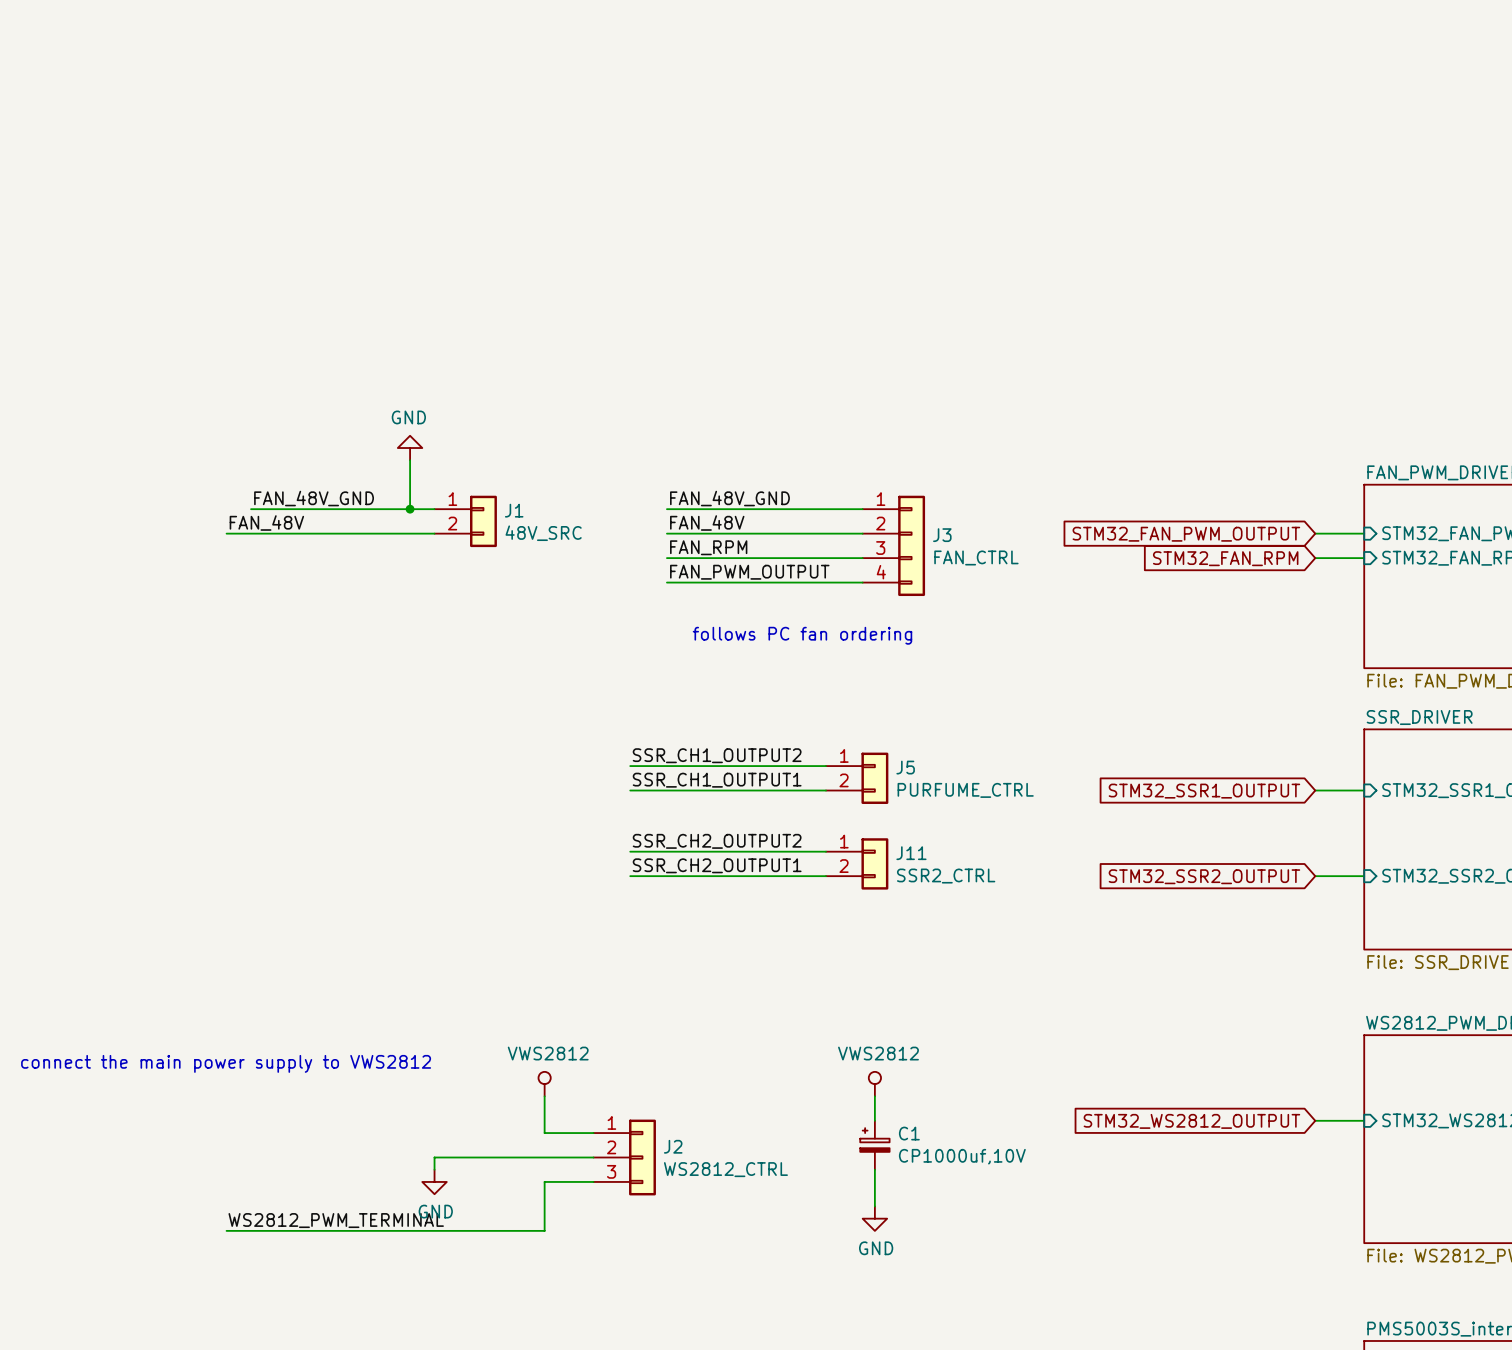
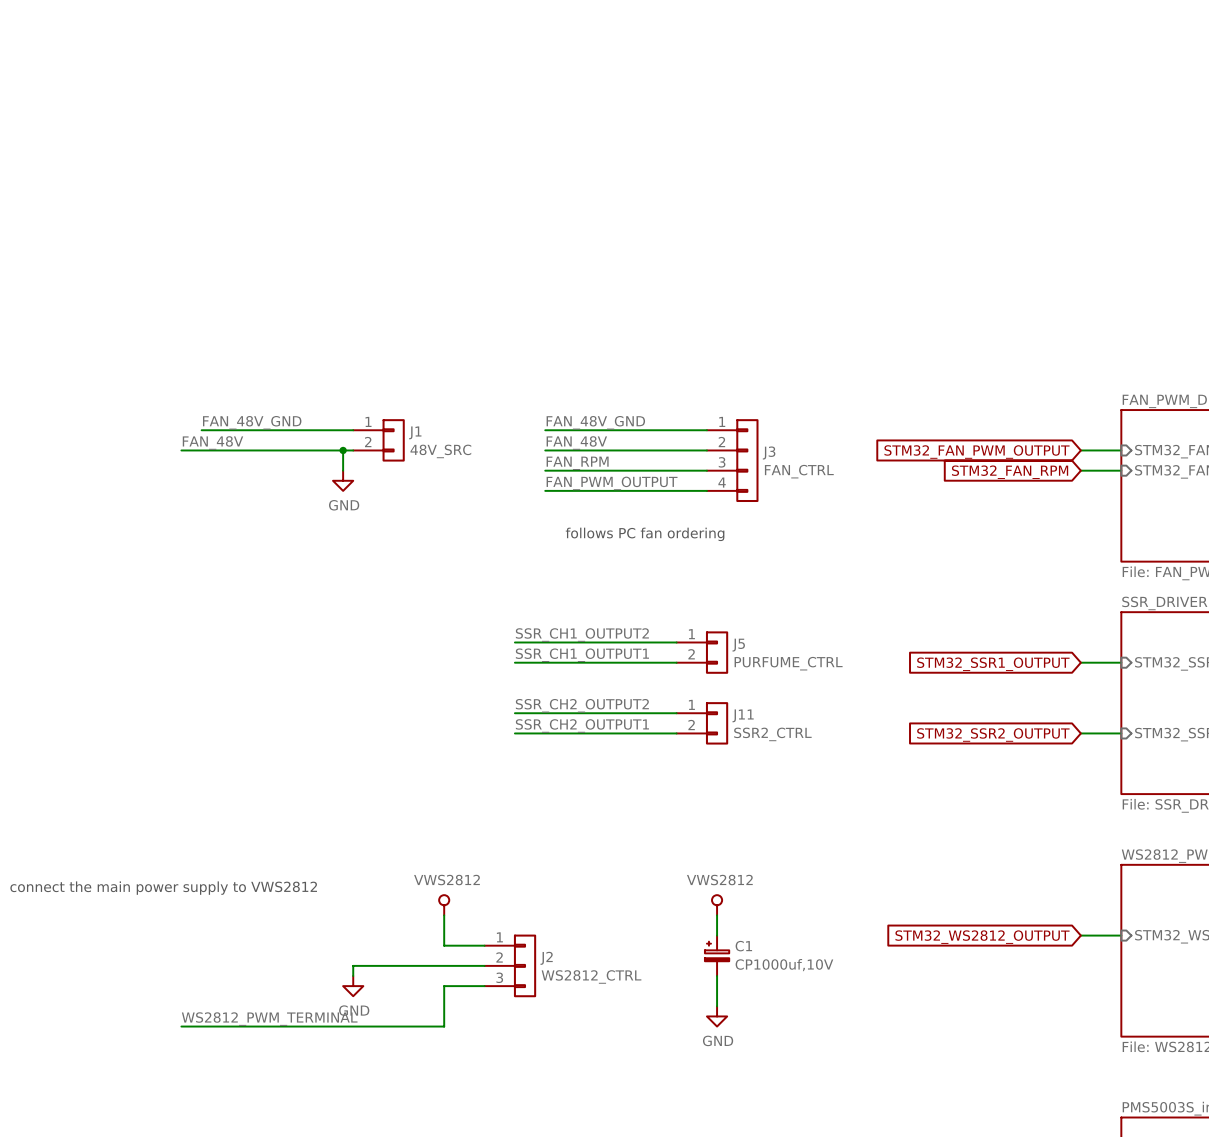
power symbol rotation: 0° (410, 448) -> 180° (343, 480)
power symbol position: GND (410, 448) -> GND (343, 480)
wire: (410, 460) (410, 509) -> none
junction position: (410, 509) -> (343, 450)
wire: none -> (343, 450) (343, 470)

